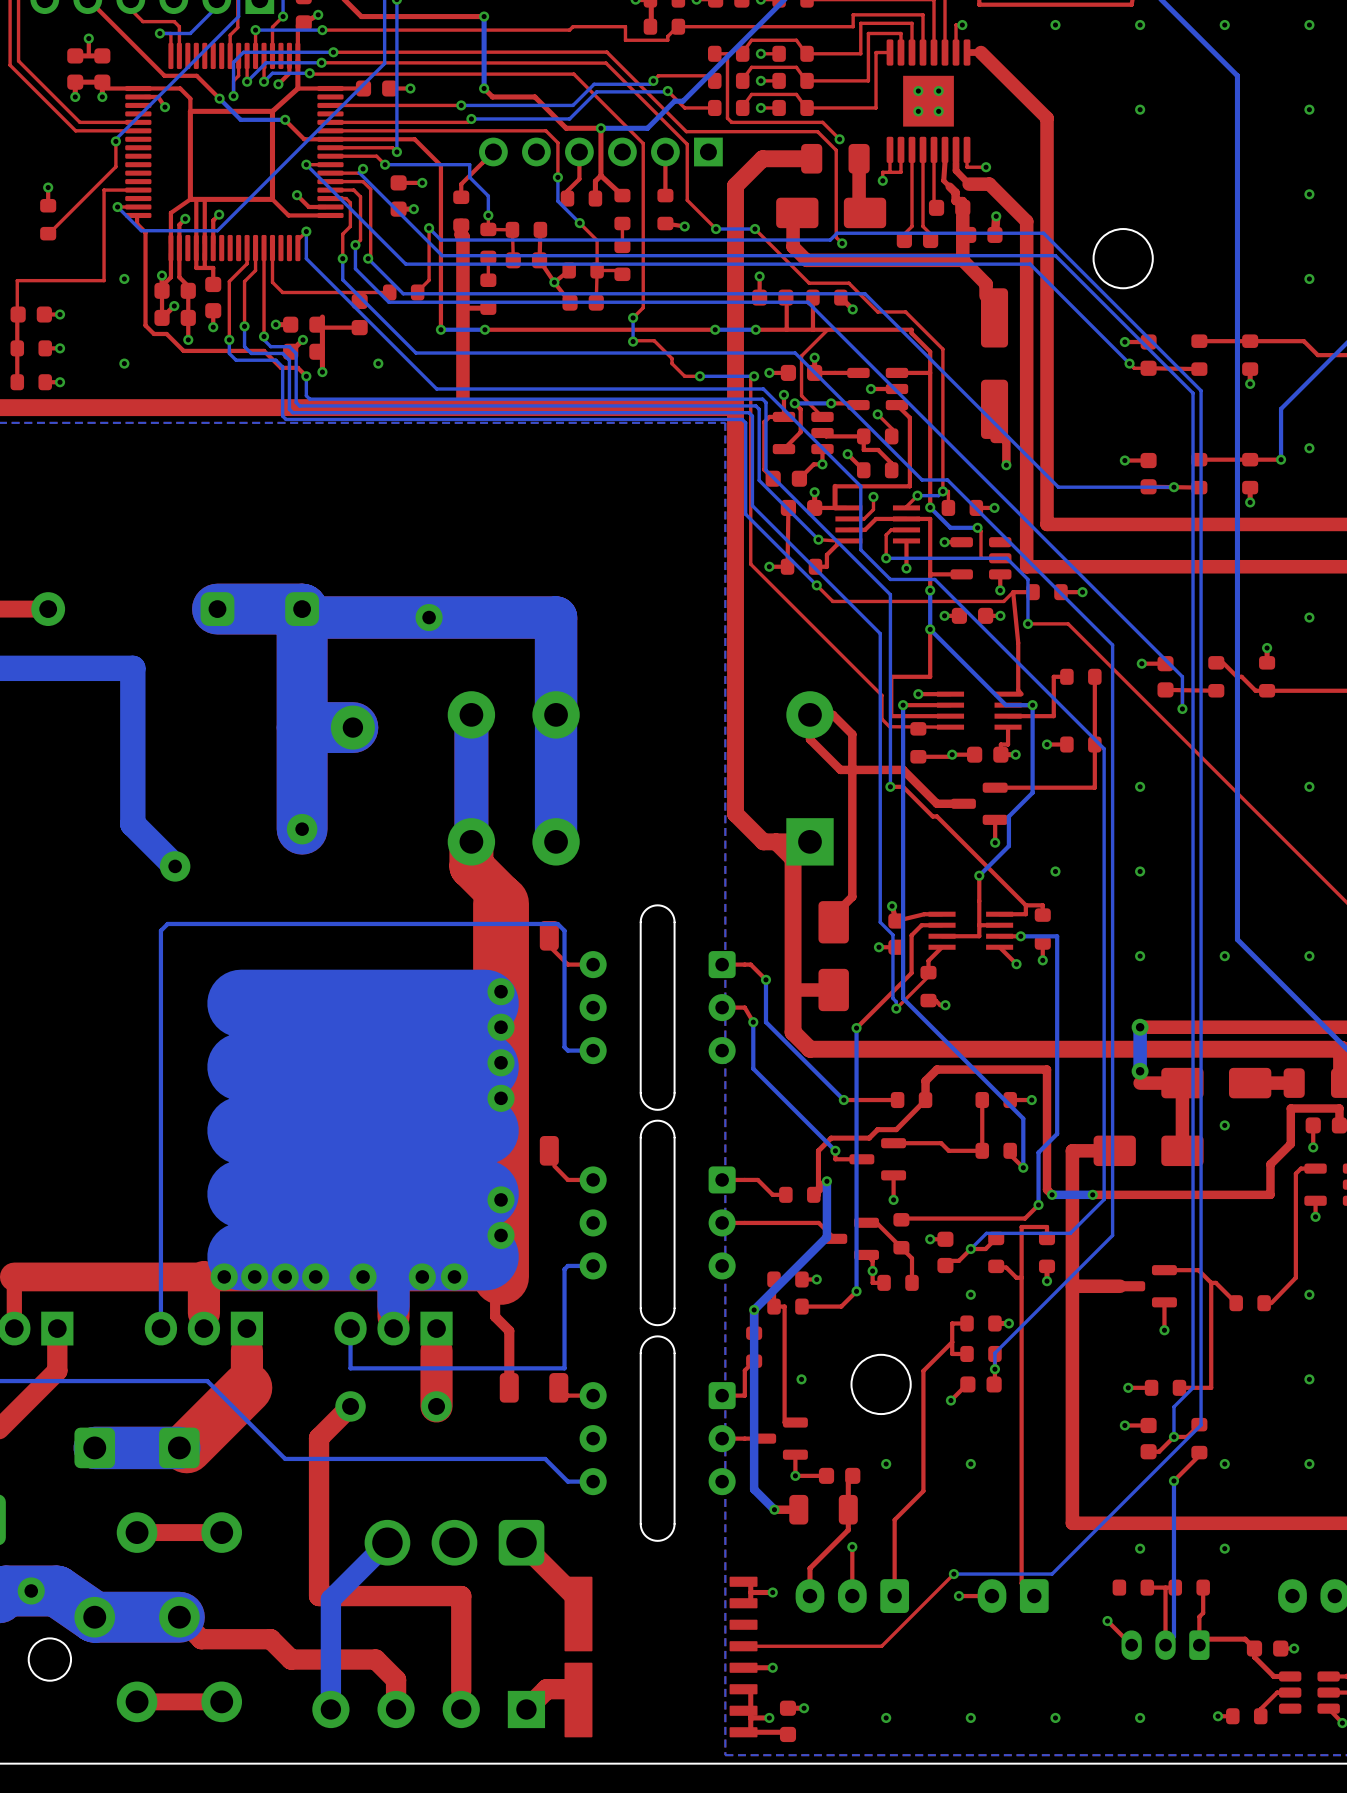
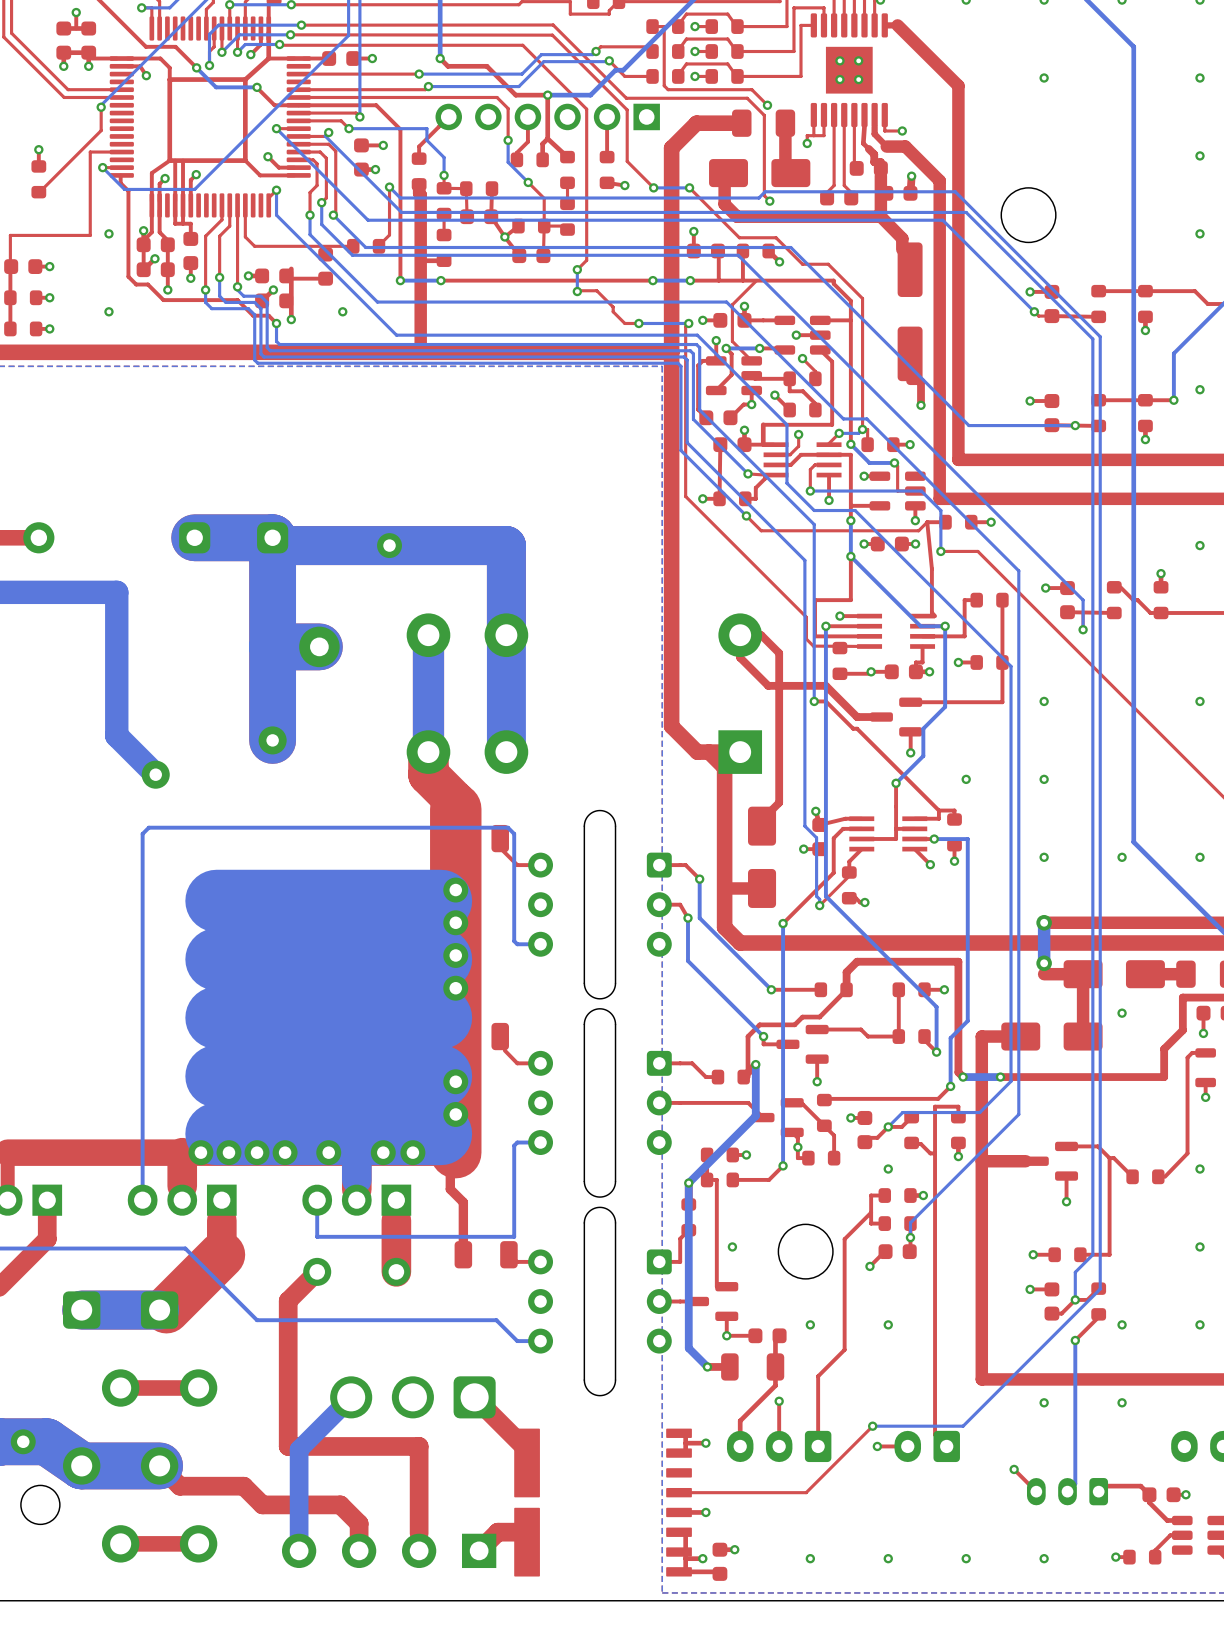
part: (1133, 1587) -> none
top track: (1165, 1587) (1165, 1645) -> none
top track: (1175, 1587) (1147, 1587) -> none
part: (1189, 1587) -> none
top track: (1203, 1587) (1203, 1612) (1199, 1616) (1199, 1645) -> none

